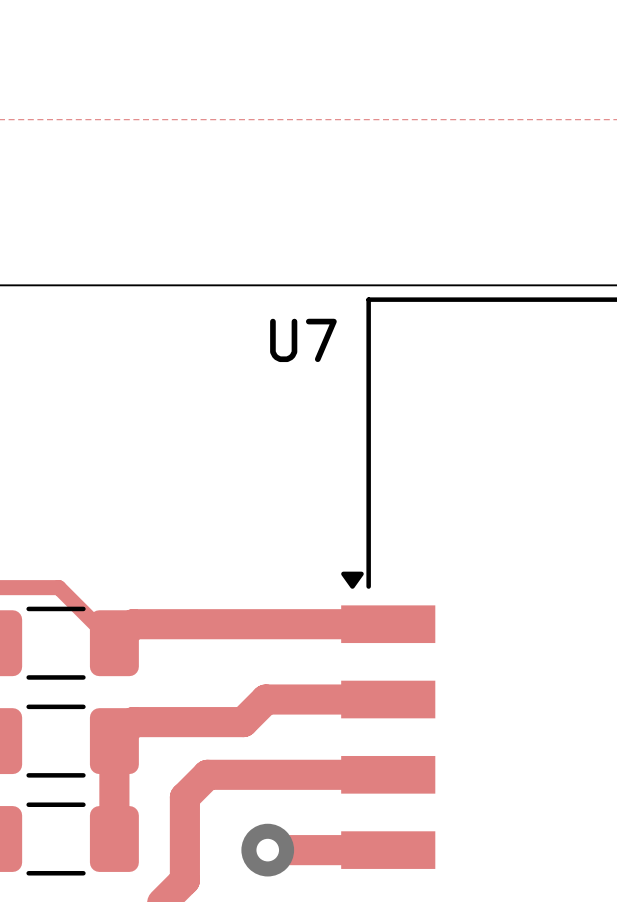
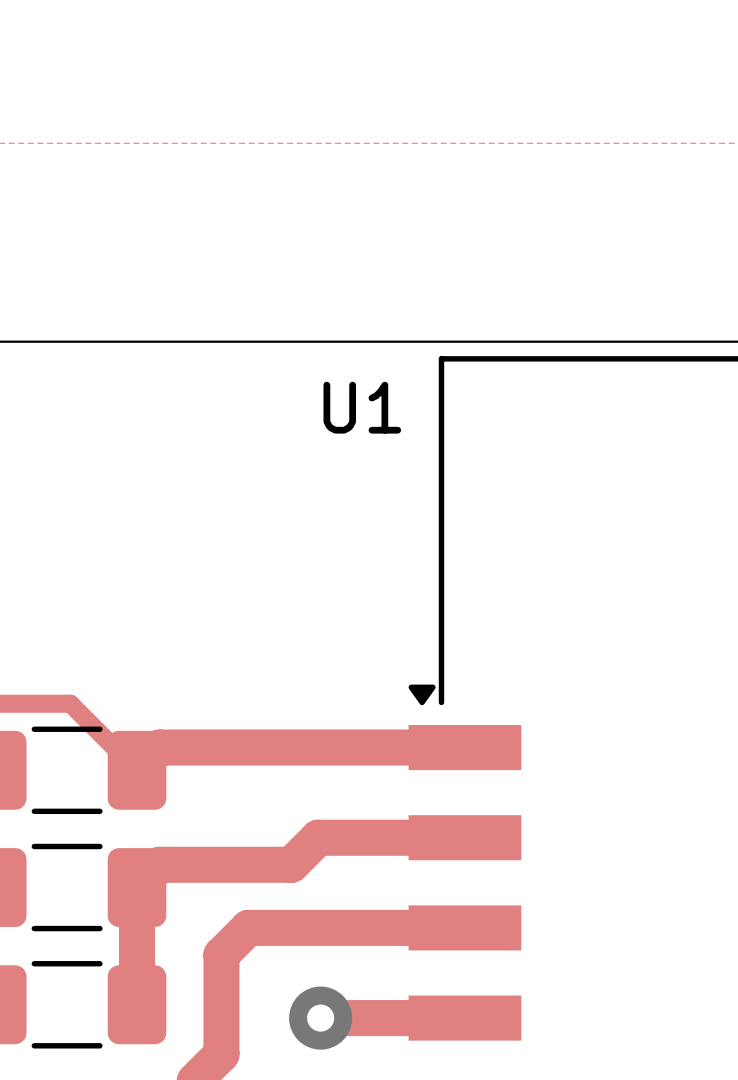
U7 name: U7 (303, 340) -> U1 (362, 407)

